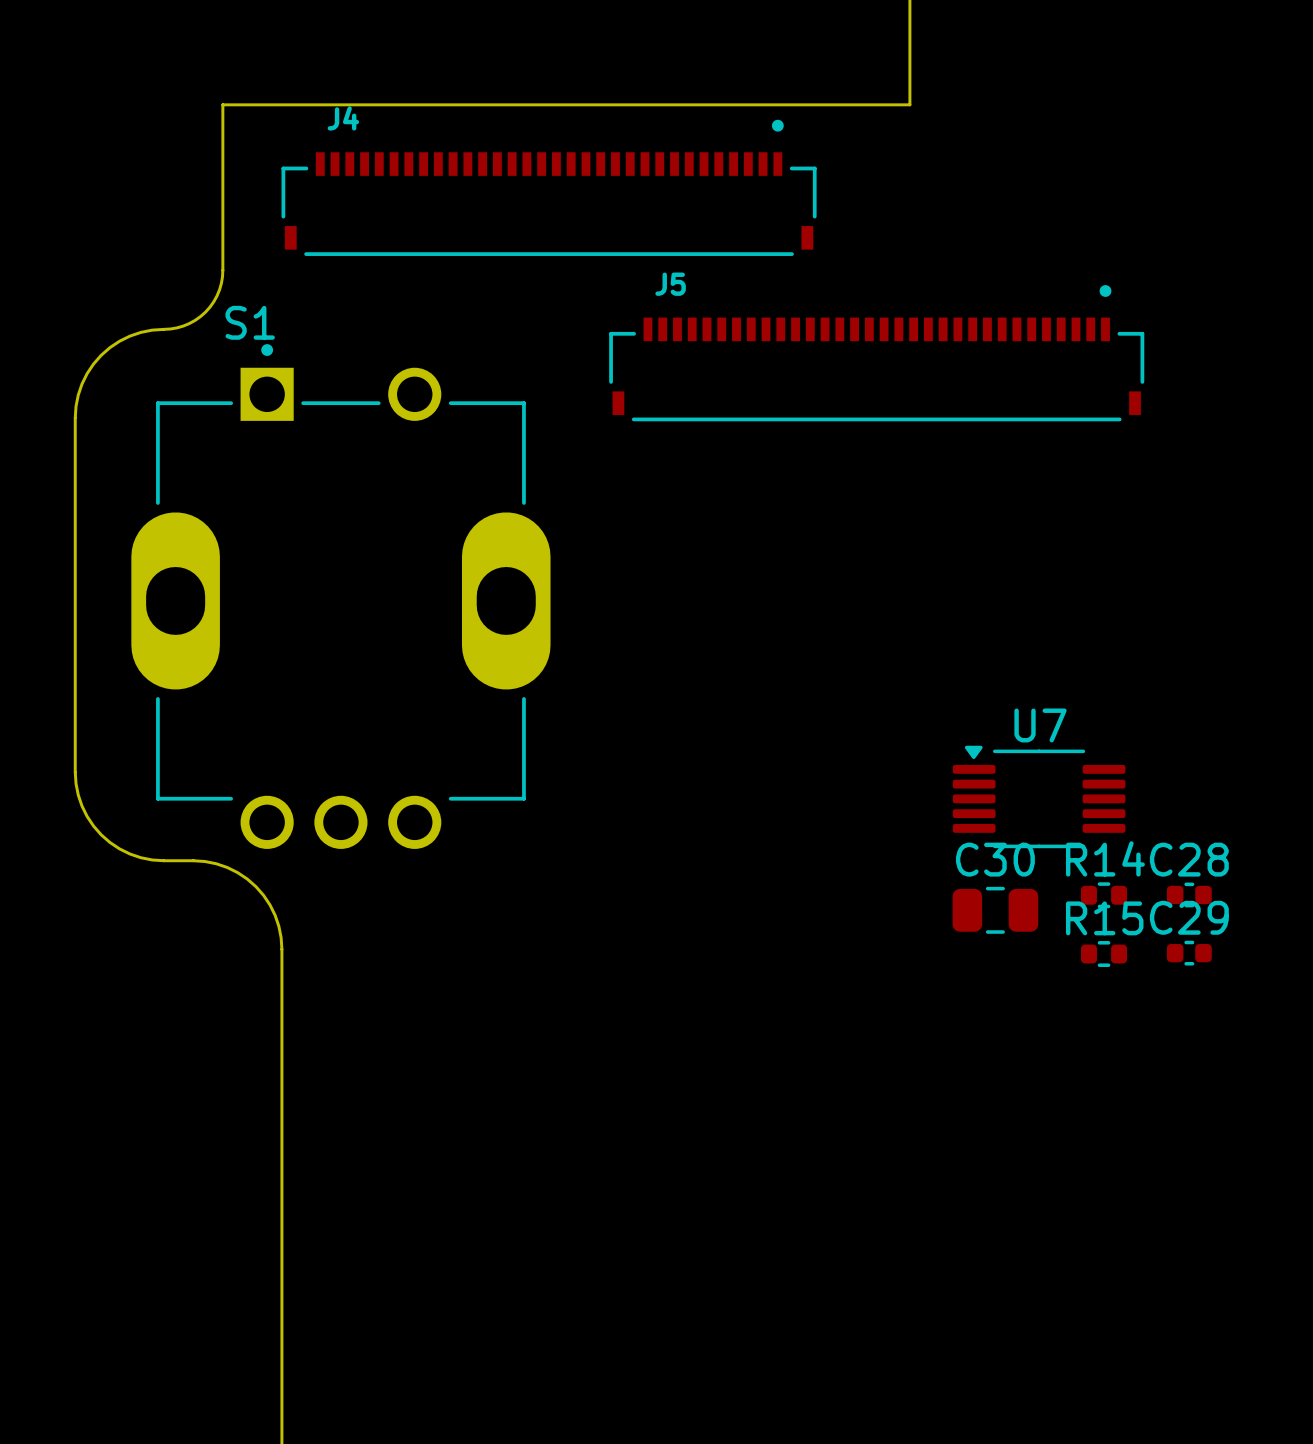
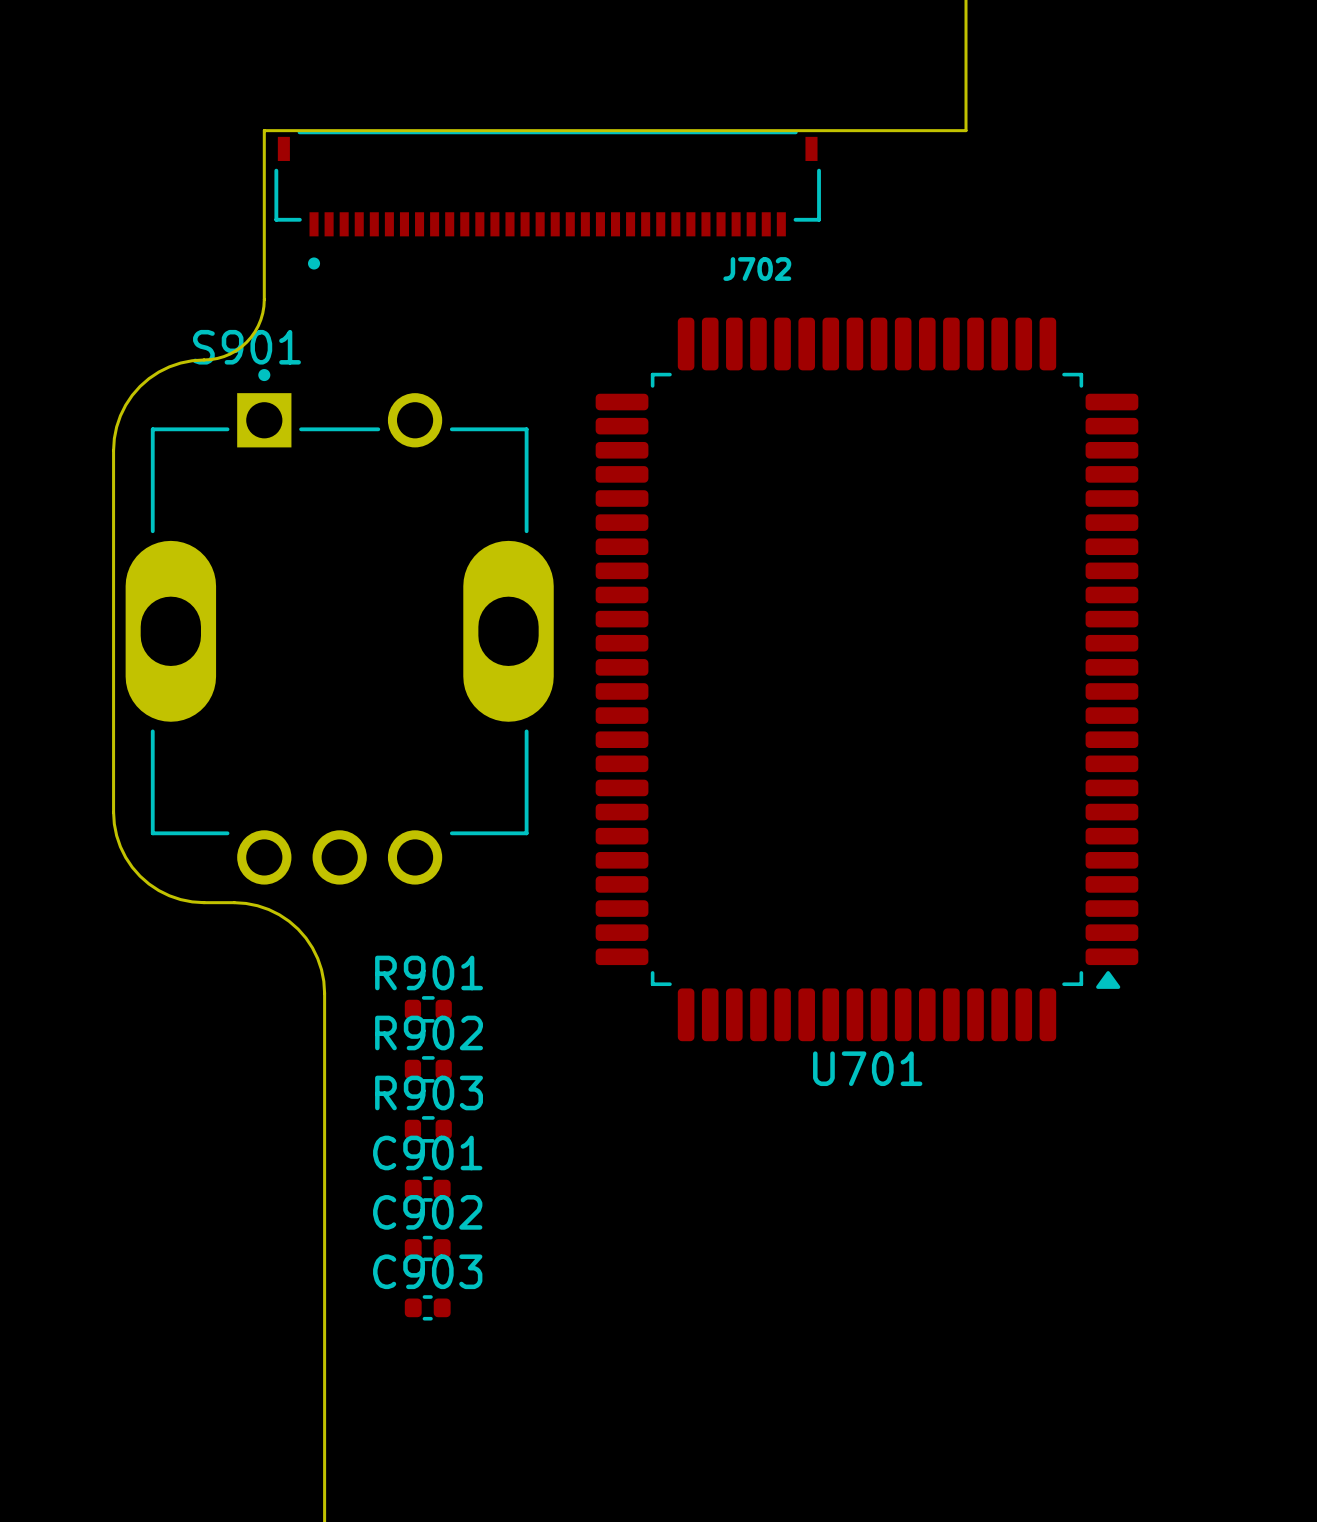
J702: none -> (547, 199)
J4: (549, 187) -> none
J5: (876, 353) -> none
S901: none -> (339, 626)
S1: (340, 596) -> none
U701: none -> (866, 679)
U7: (1039, 796) -> none
C28: (1189, 894) -> none
R14: (1104, 895) -> none
C30: (995, 910) -> none
C29: (1189, 953) -> none
R15: (1104, 954) -> none
R901: none -> (428, 1009)
R902: none -> (428, 1069)
R903: none -> (428, 1129)
C901: none -> (427, 1189)
C902: none -> (427, 1248)
C903: none -> (427, 1307)

